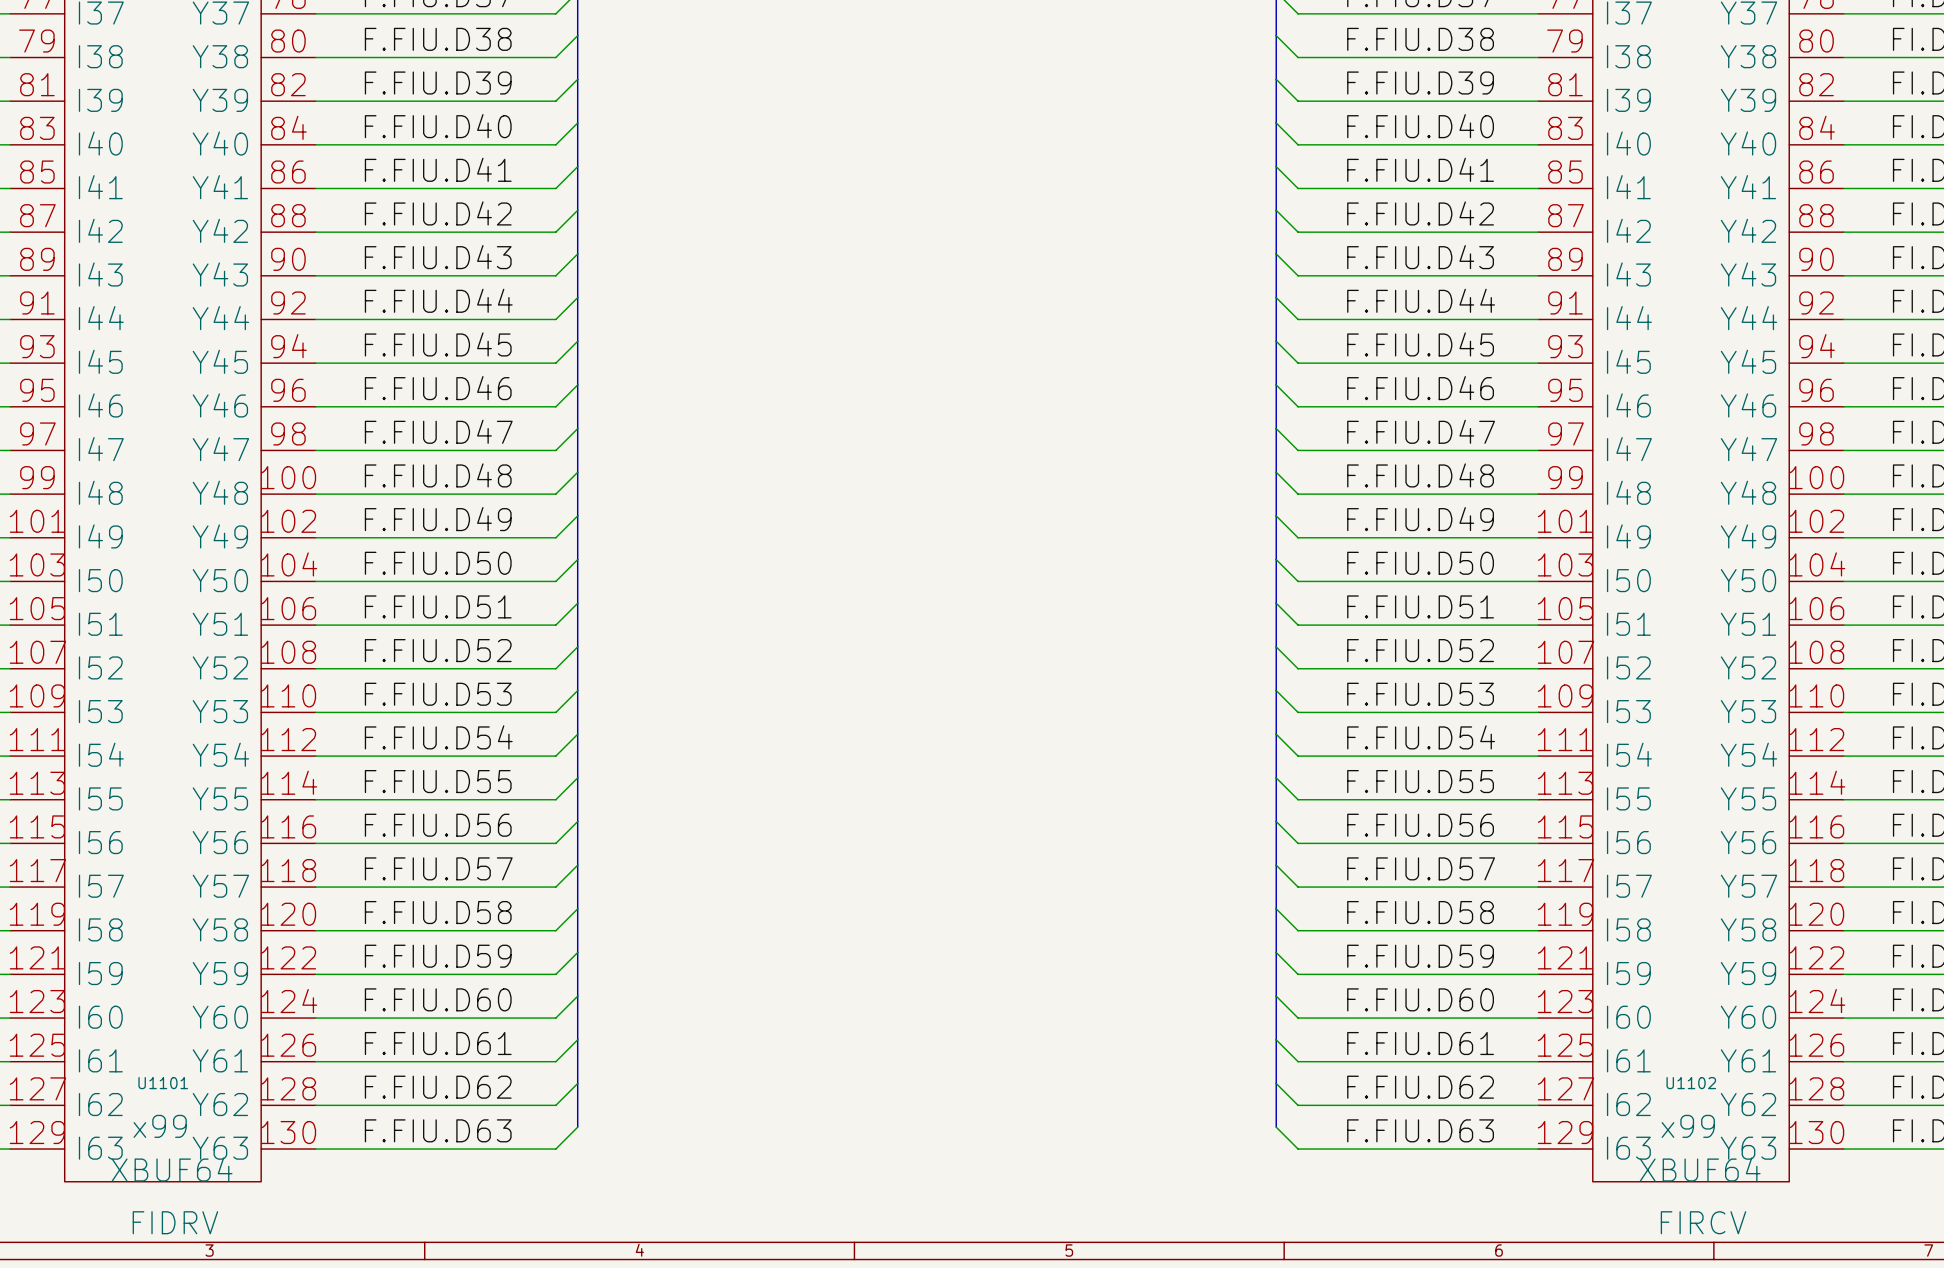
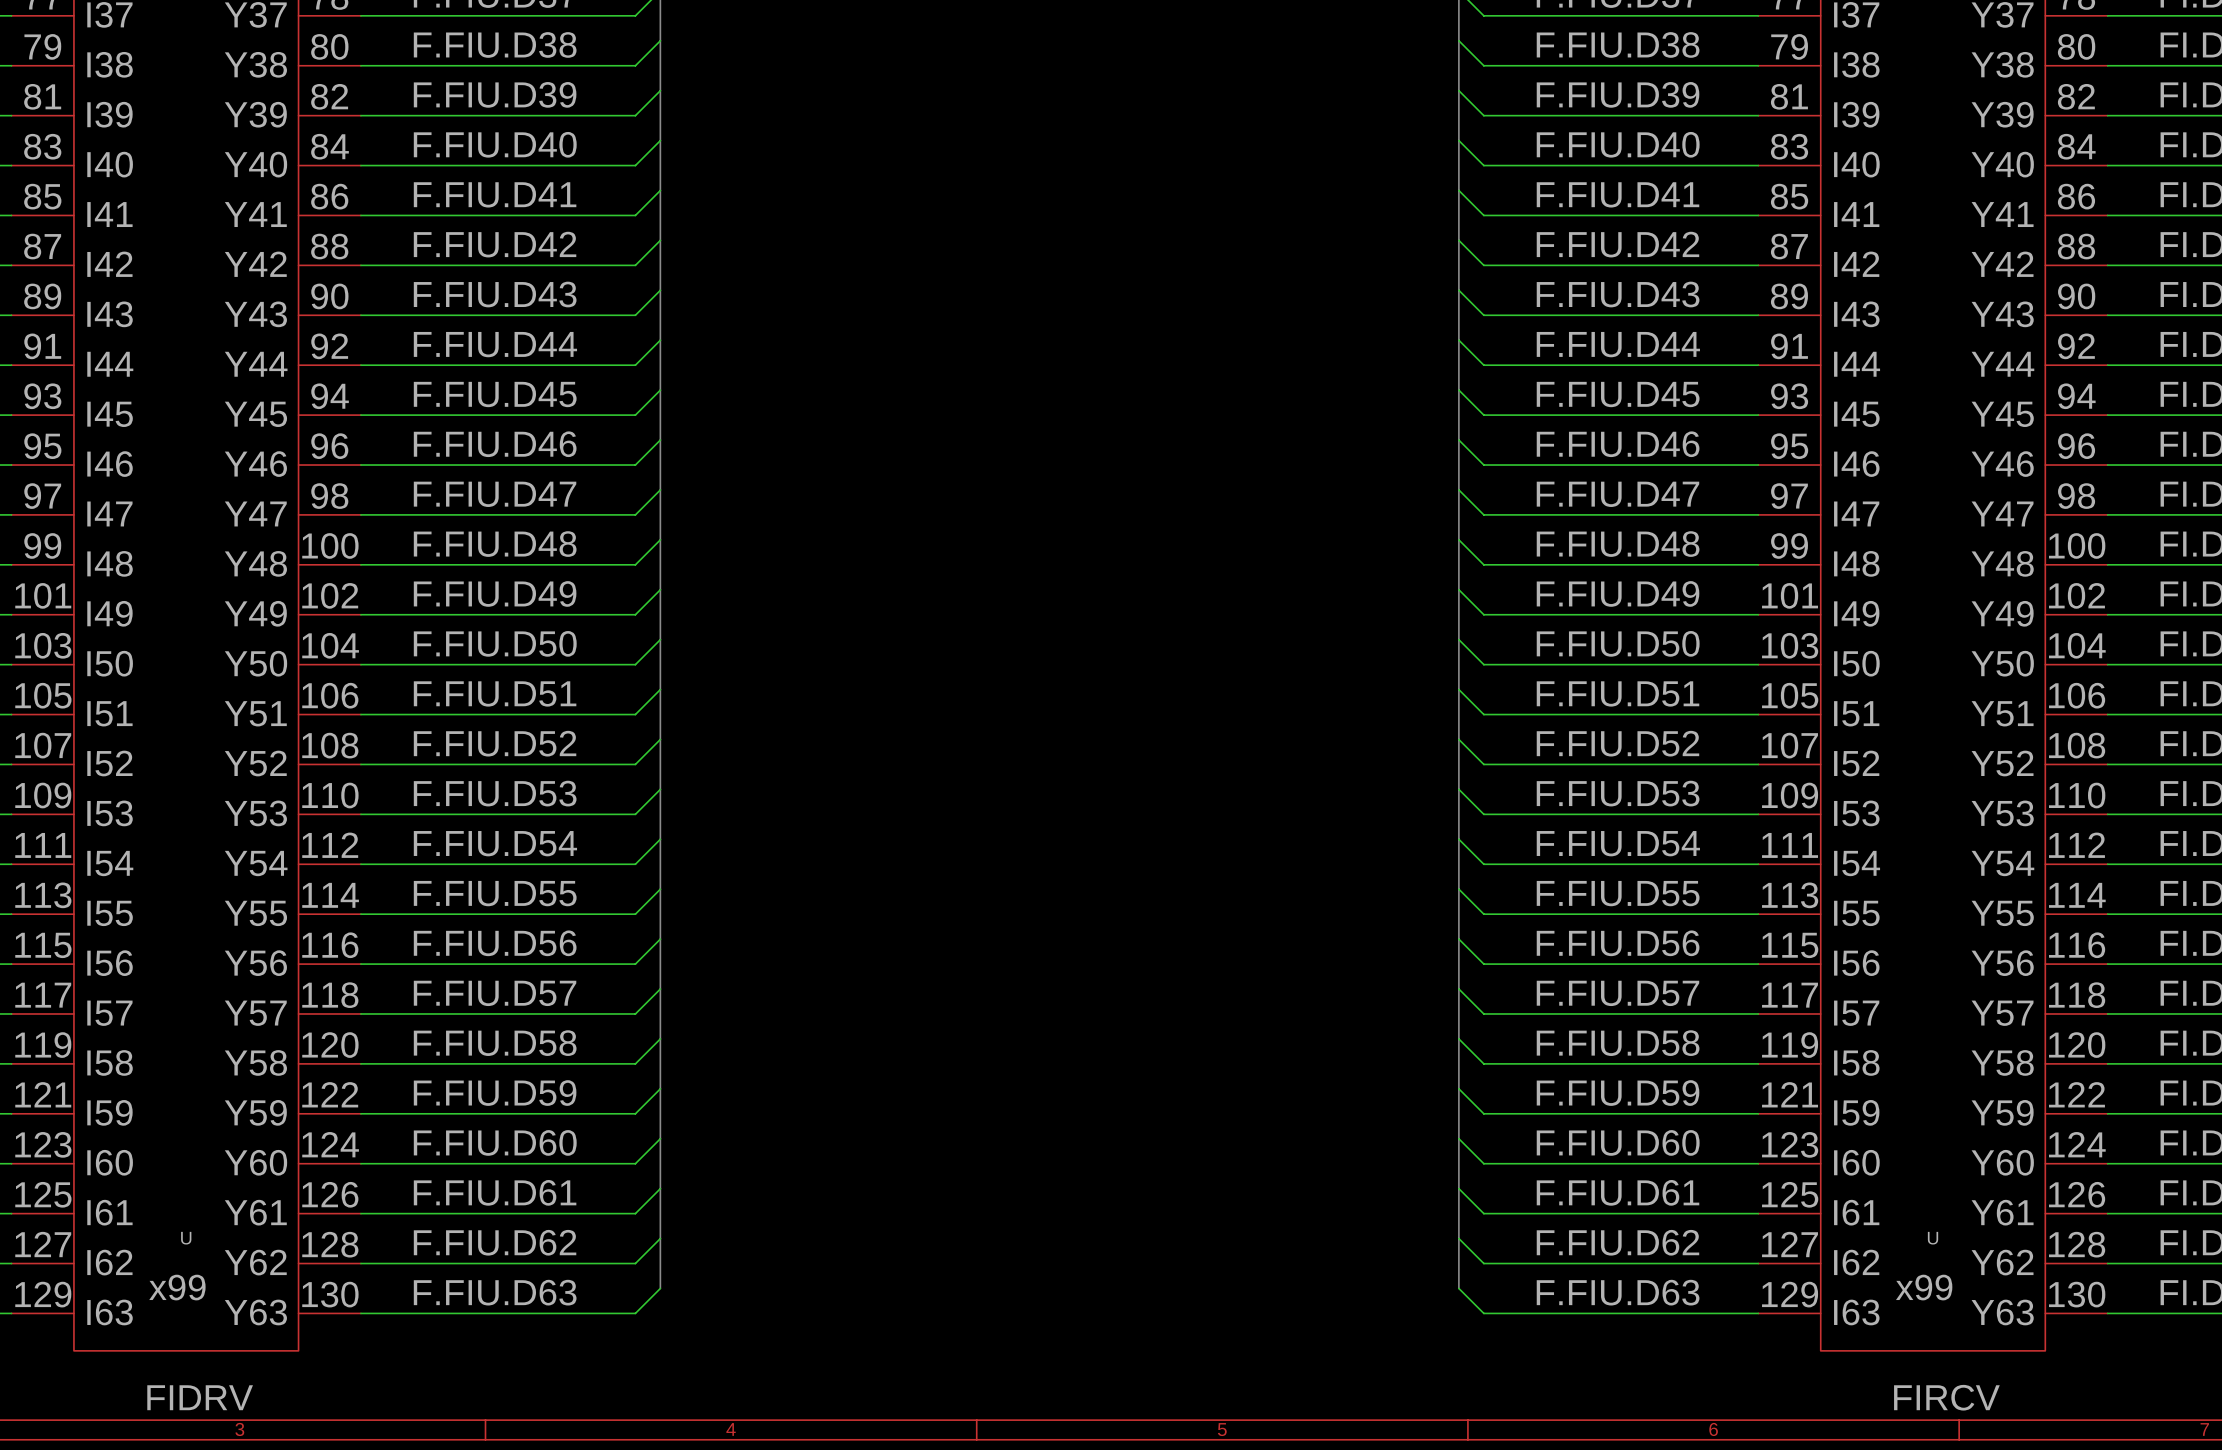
U1101 name: U1101 (163, 1083) -> U (186, 1238)
U1102 name: U1102 (1691, 1083) -> U (1933, 1238)
U1101 value: XBUF64 (172, 1169) -> none
U1102 value: XBUF64 (1700, 1169) -> none

